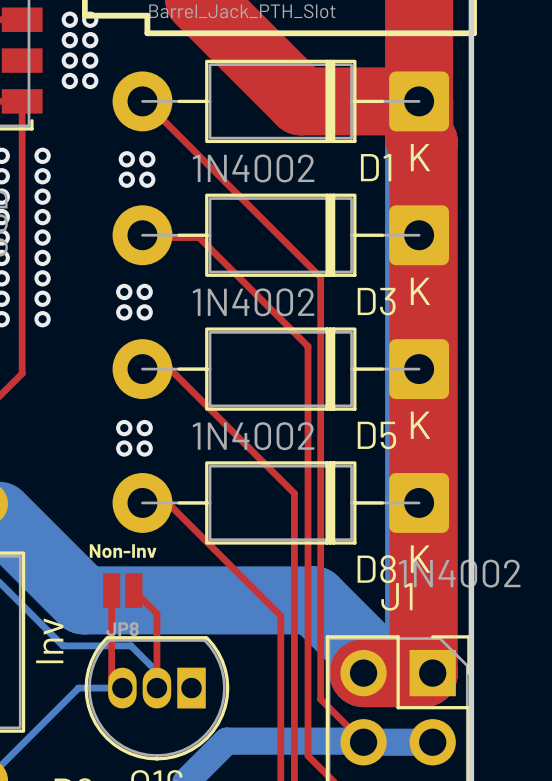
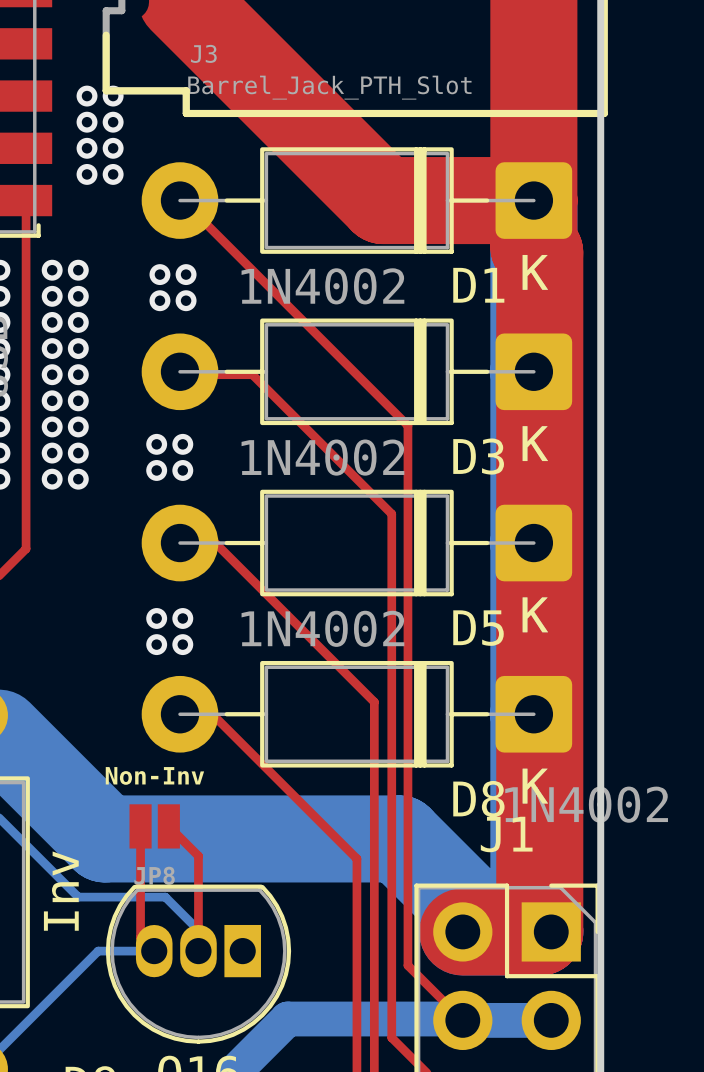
via: none -> (78, 270)
via: none -> (78, 296)
via: none -> (78, 322)
via: none -> (78, 348)
via: none -> (78, 374)
via: none -> (78, 400)
via: none -> (78, 426)
via: none -> (78, 453)
via: none -> (78, 479)

